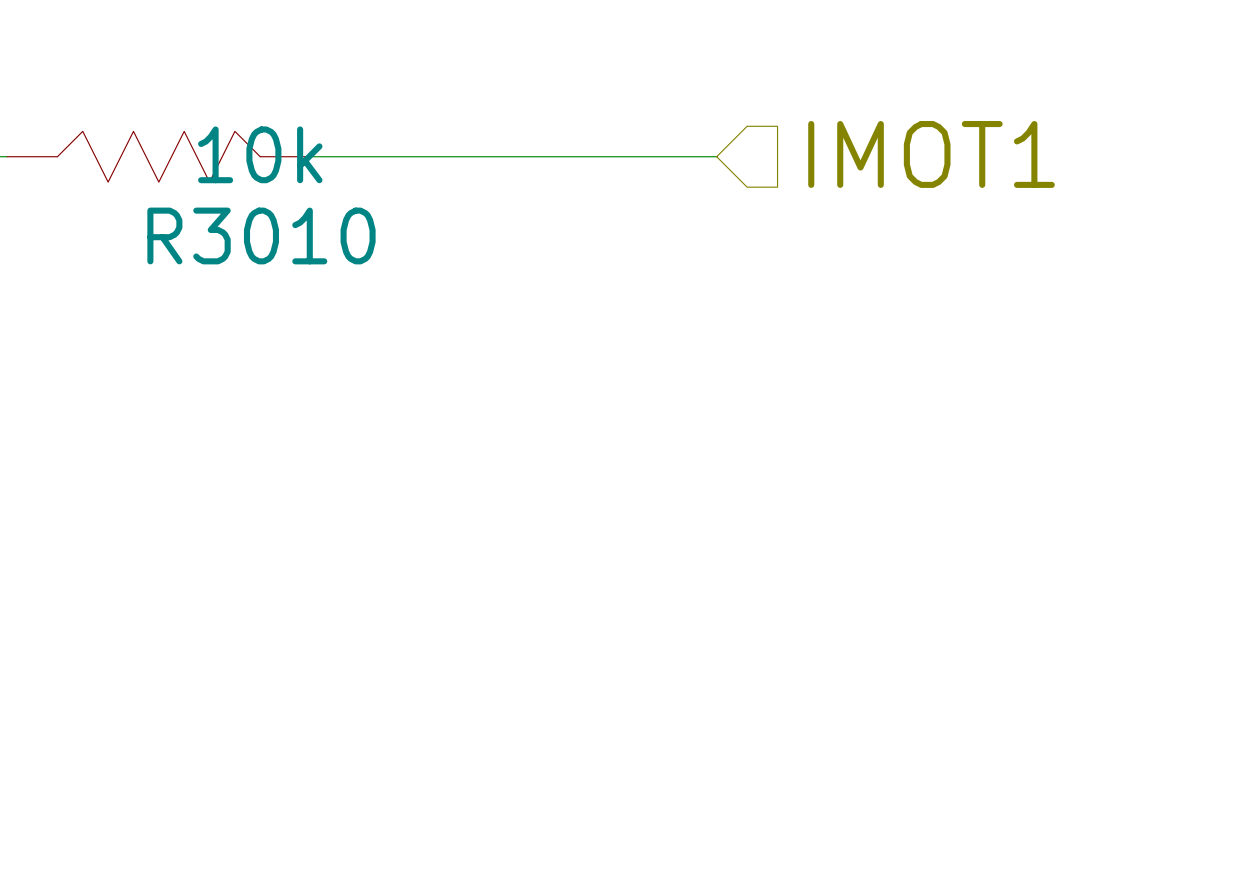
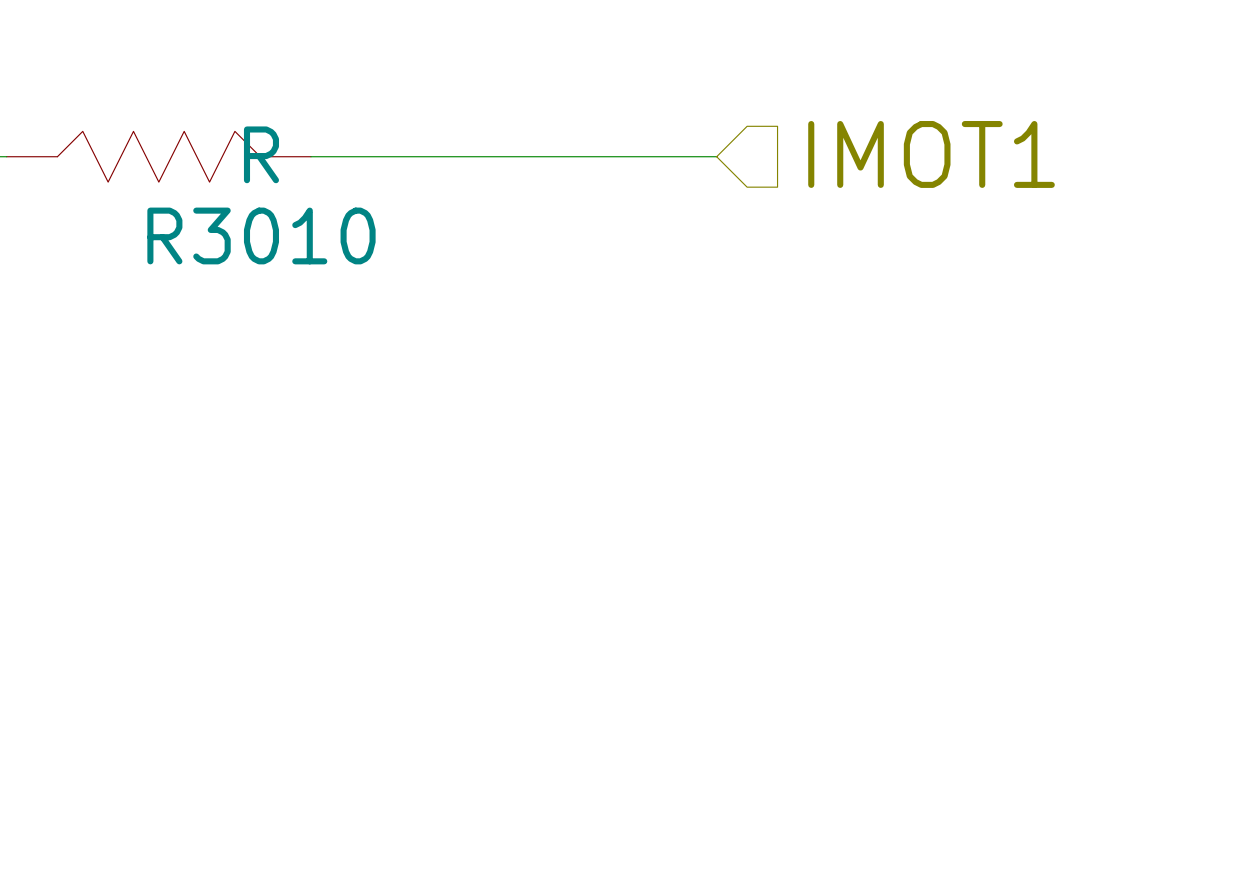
R3010 value: 10k (260, 154) -> R (261, 154)

